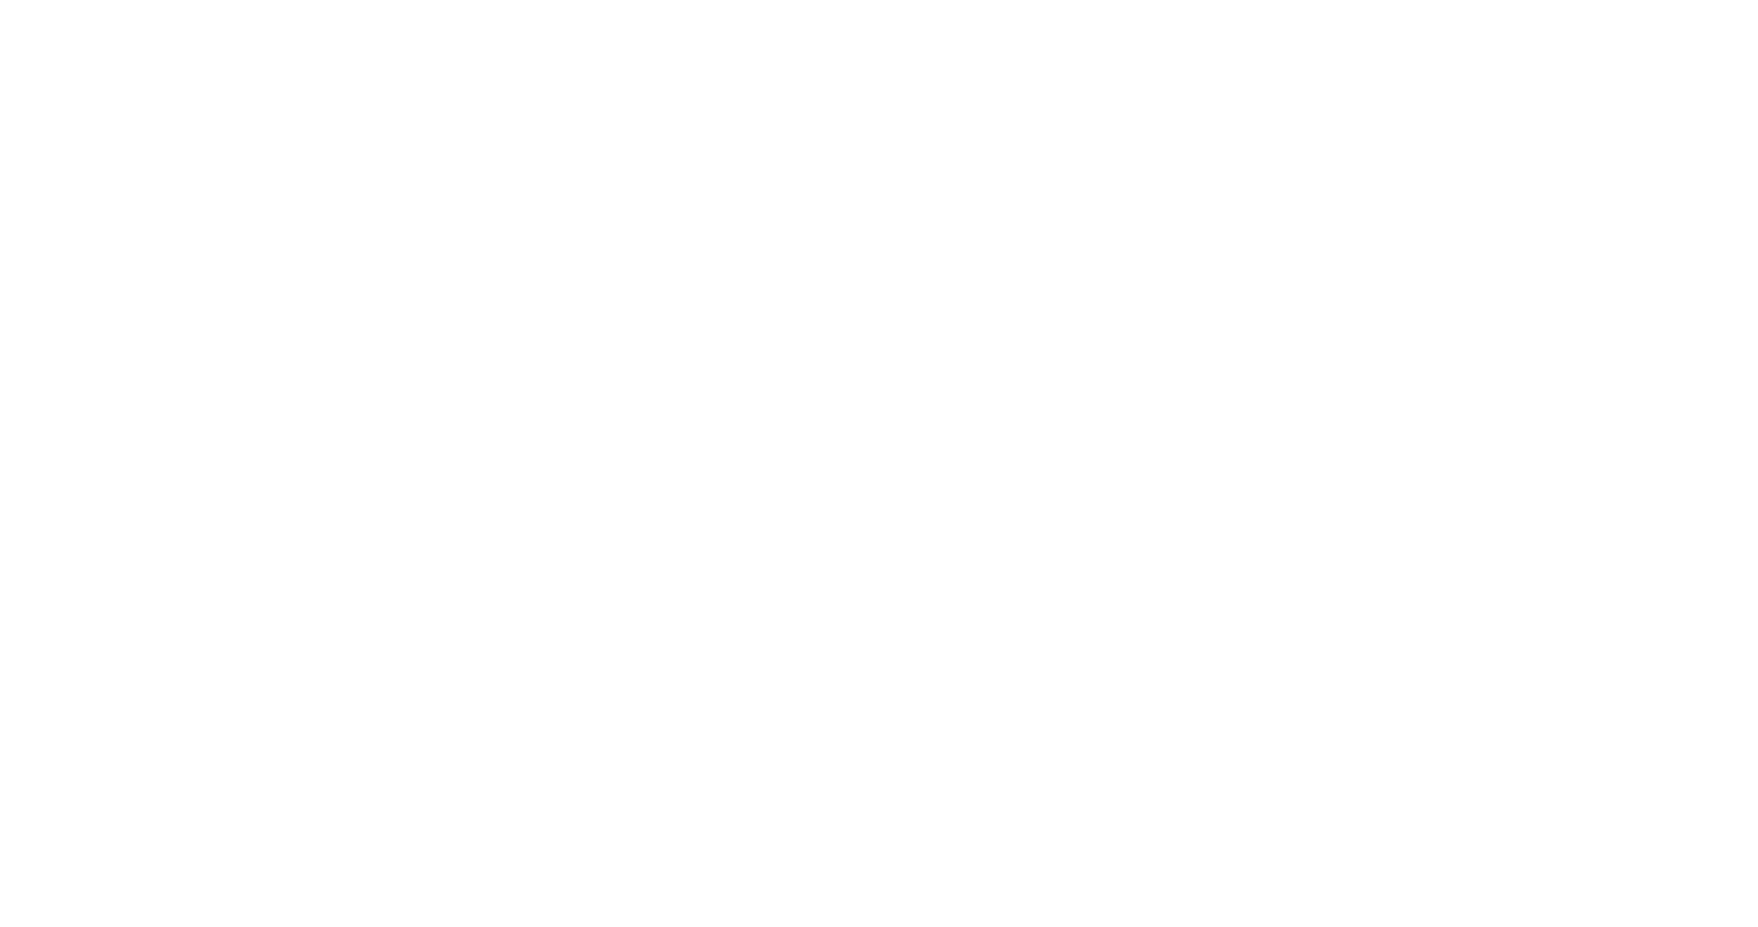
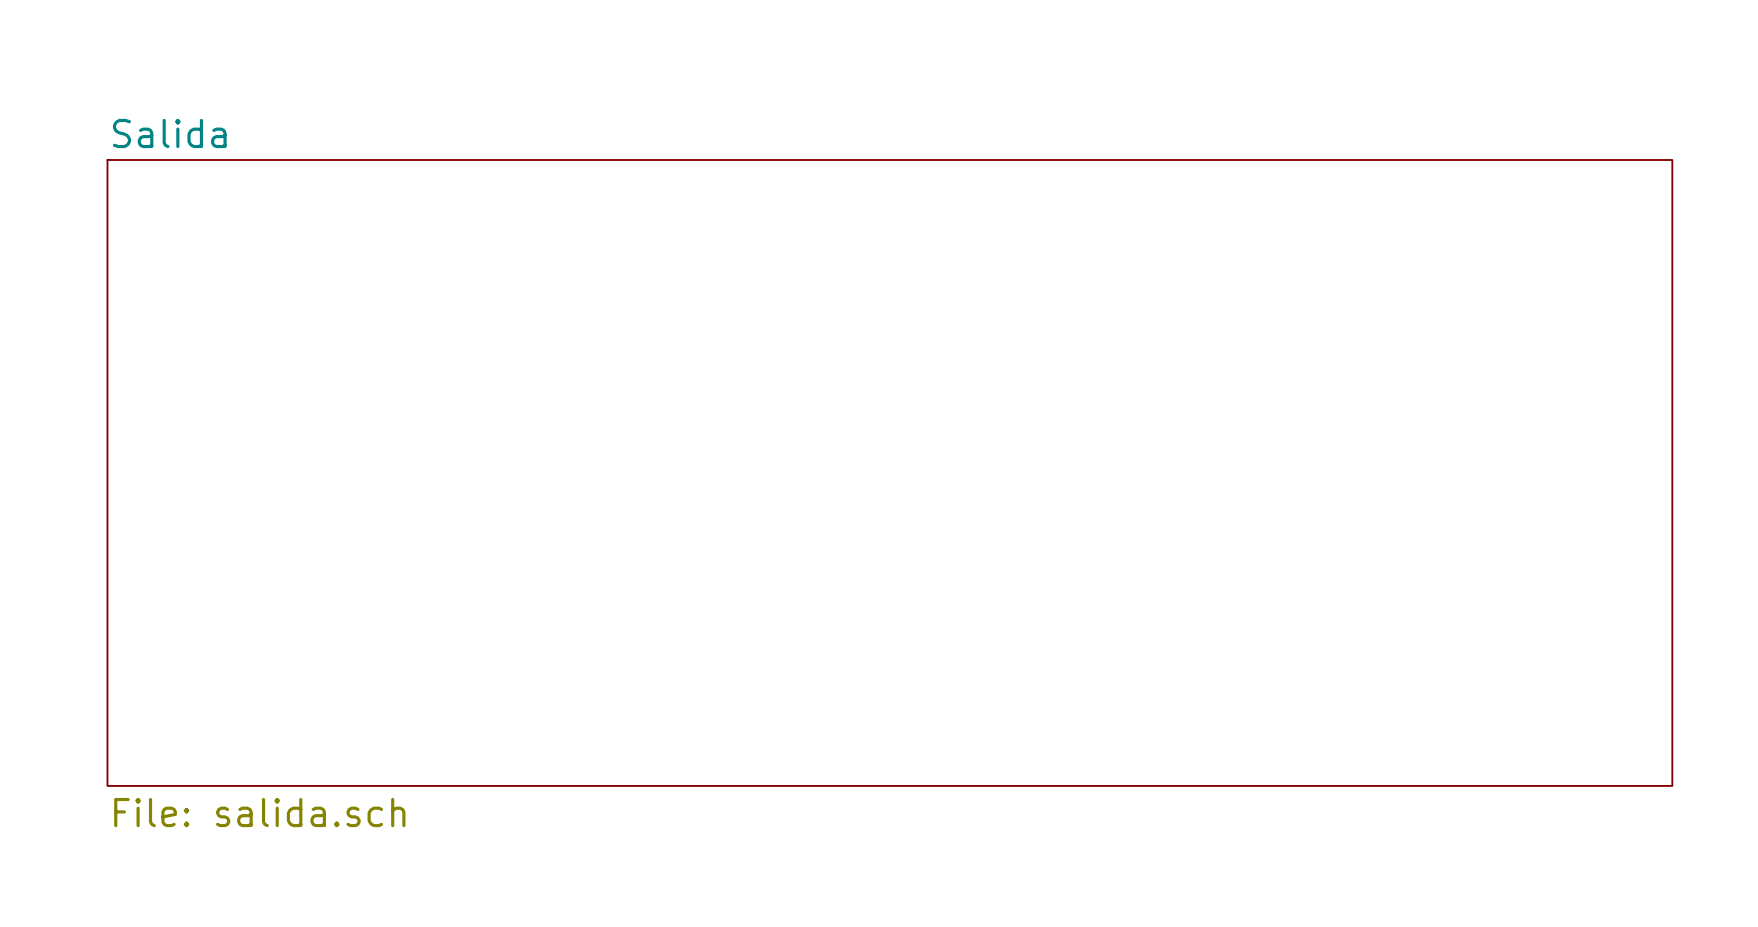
sheet Salida: none -> File: salida.sch (889, 472)

